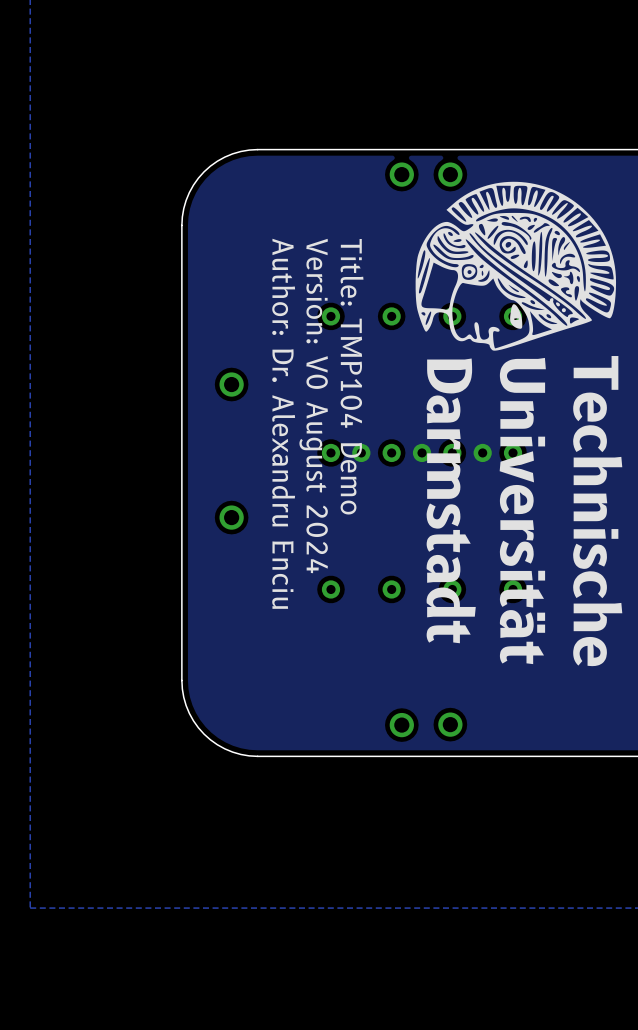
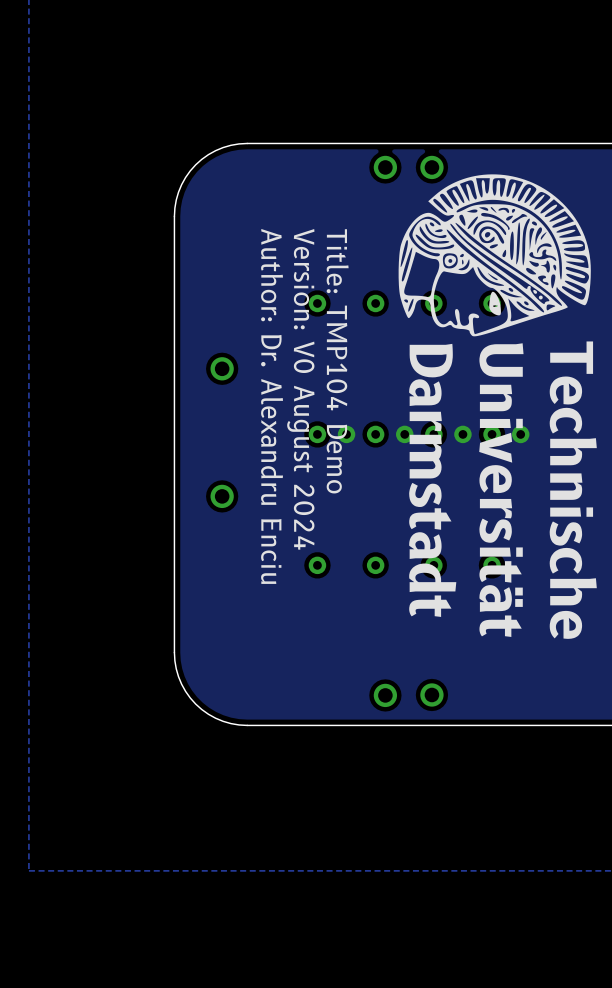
via: none -> (520, 434)

